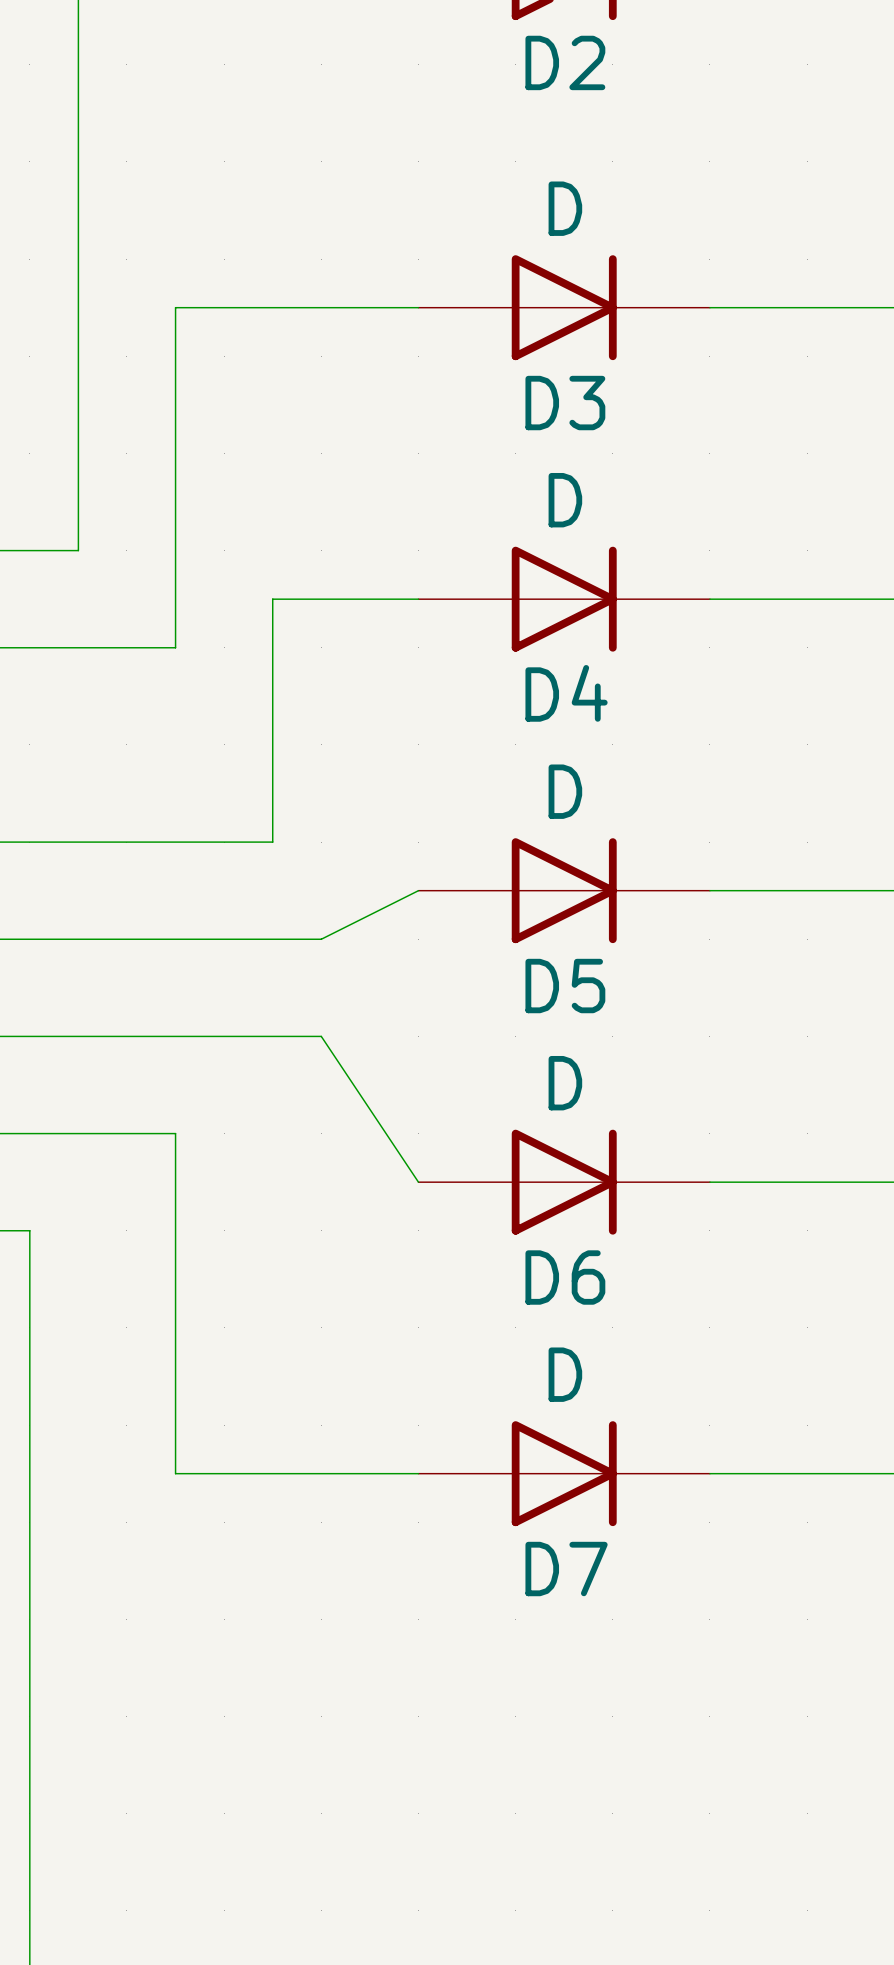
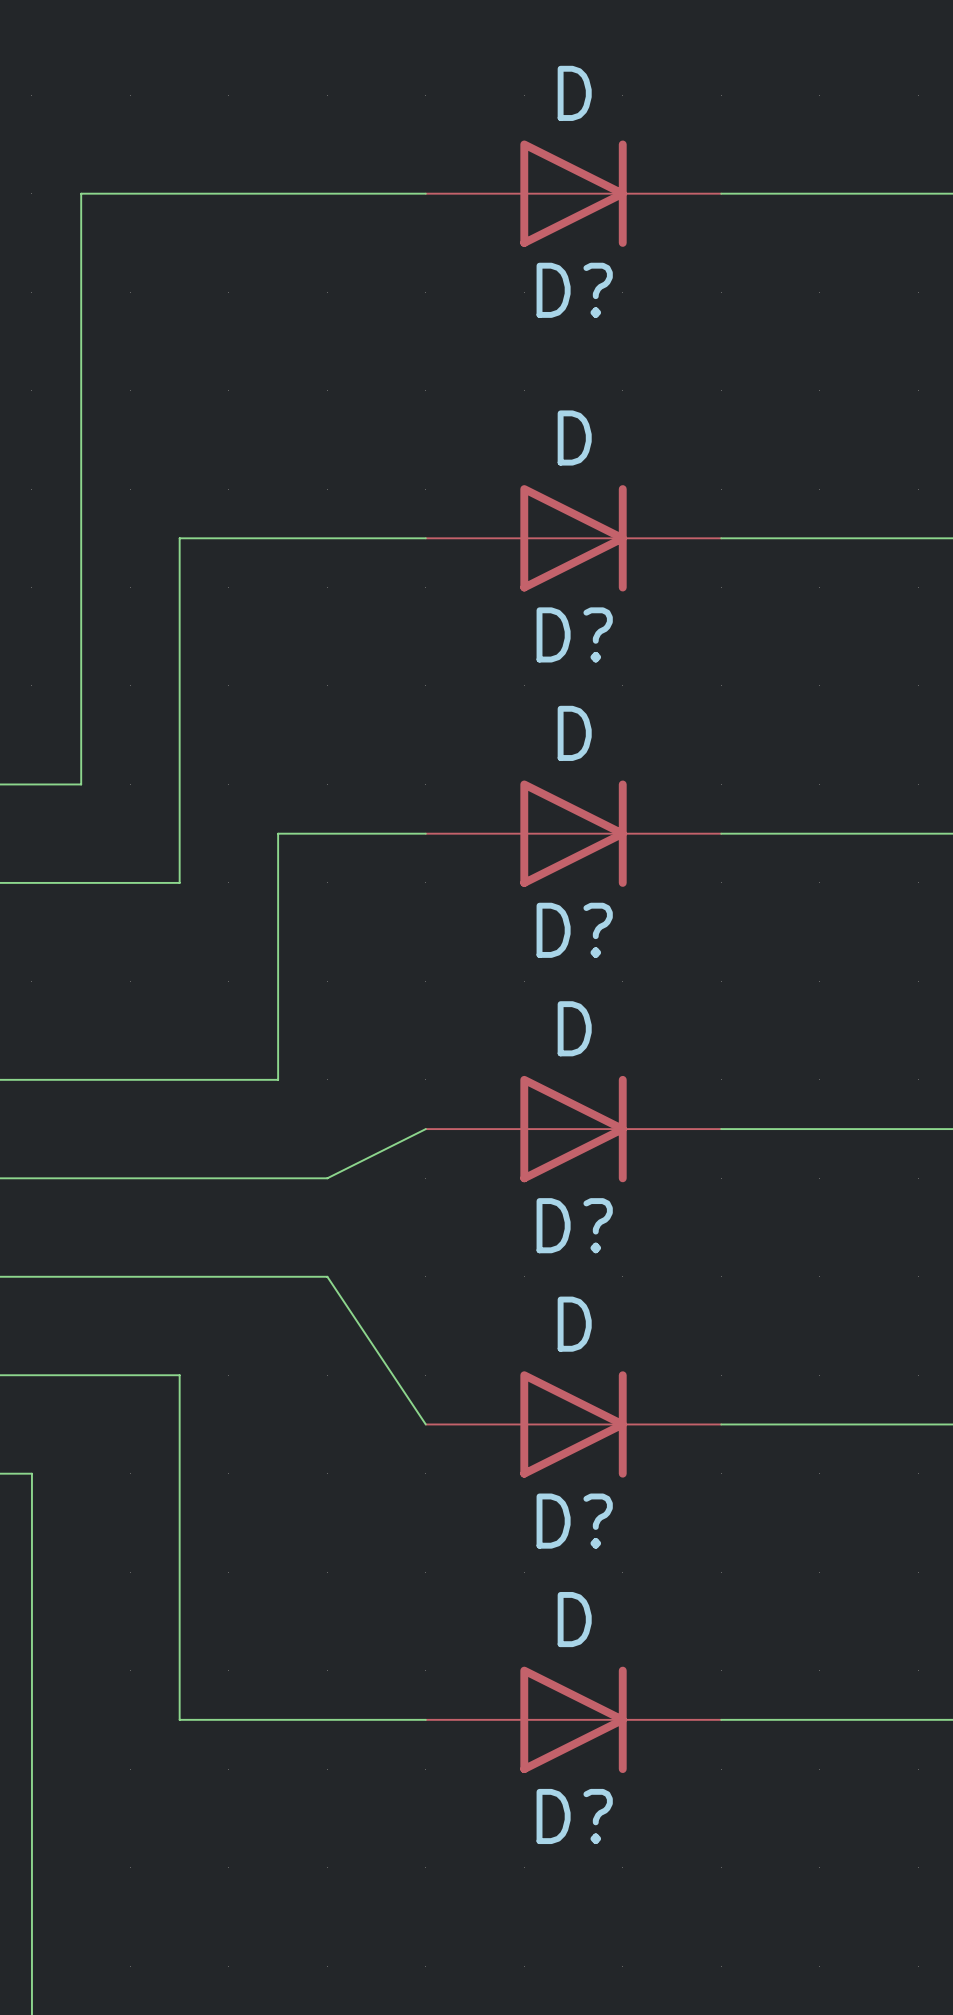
D2 name: D2 (565, 62) -> D? (574, 290)
D3 name: D3 (565, 403) -> D? (574, 634)
D4 name: D4 (566, 693) -> D? (574, 930)
D5 name: D5 (565, 986) -> D? (574, 1225)
D6 name: D6 (565, 1277) -> D? (574, 1521)
D7 name: D7 (566, 1569) -> D? (574, 1816)

